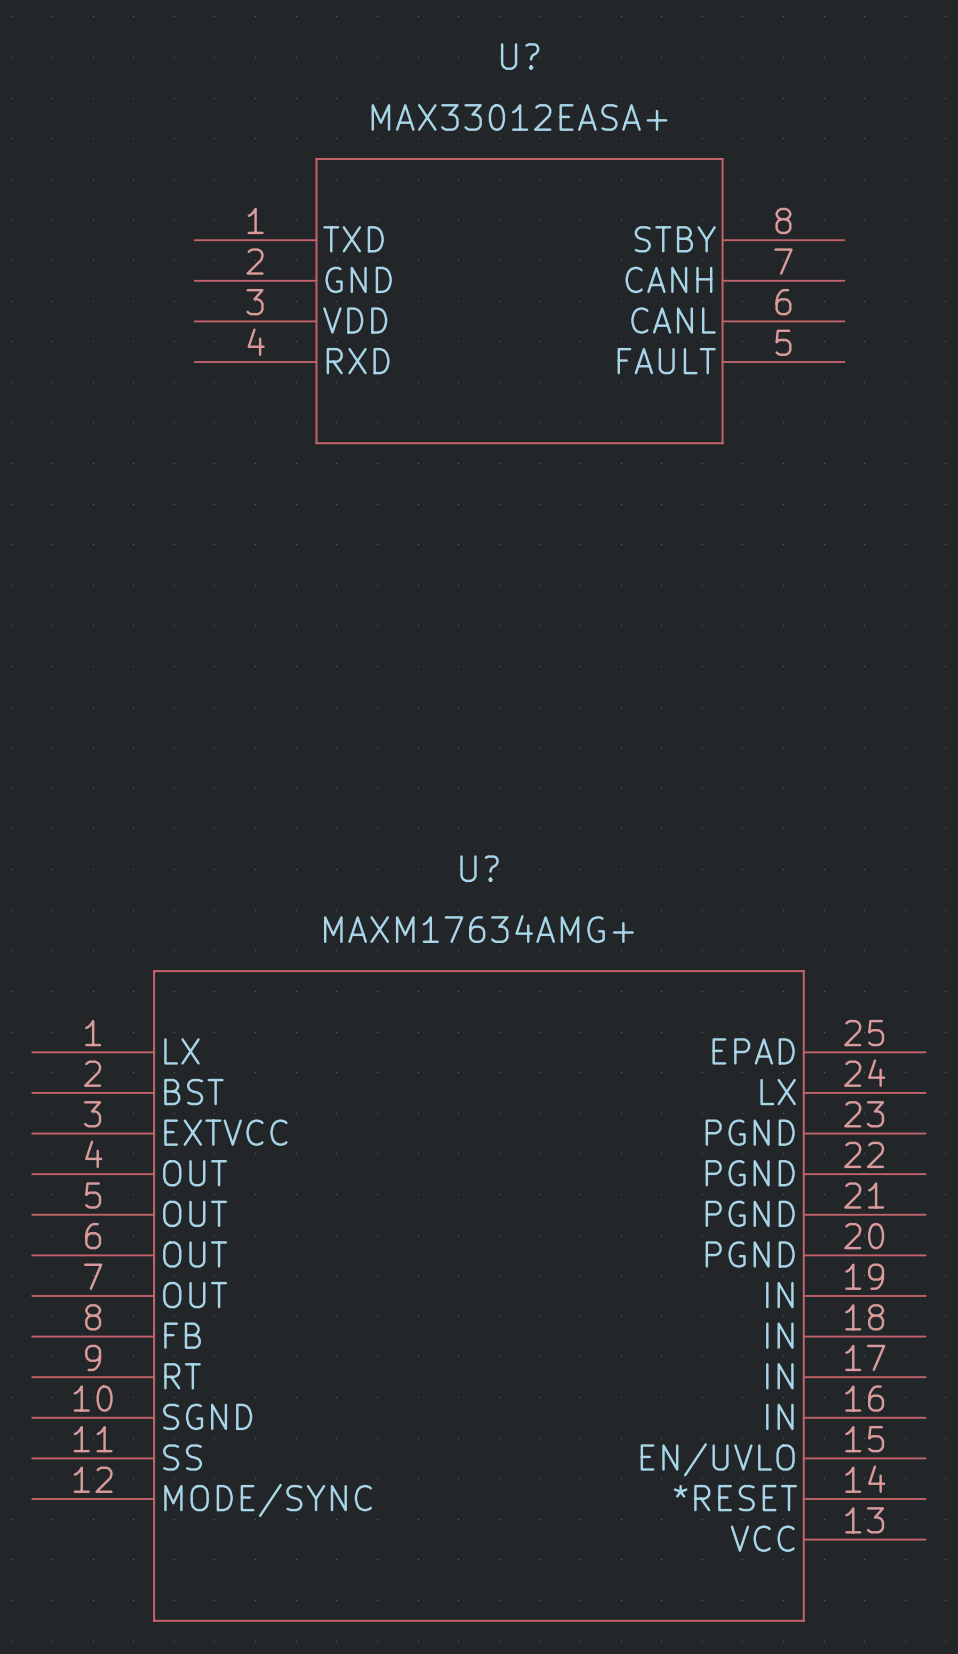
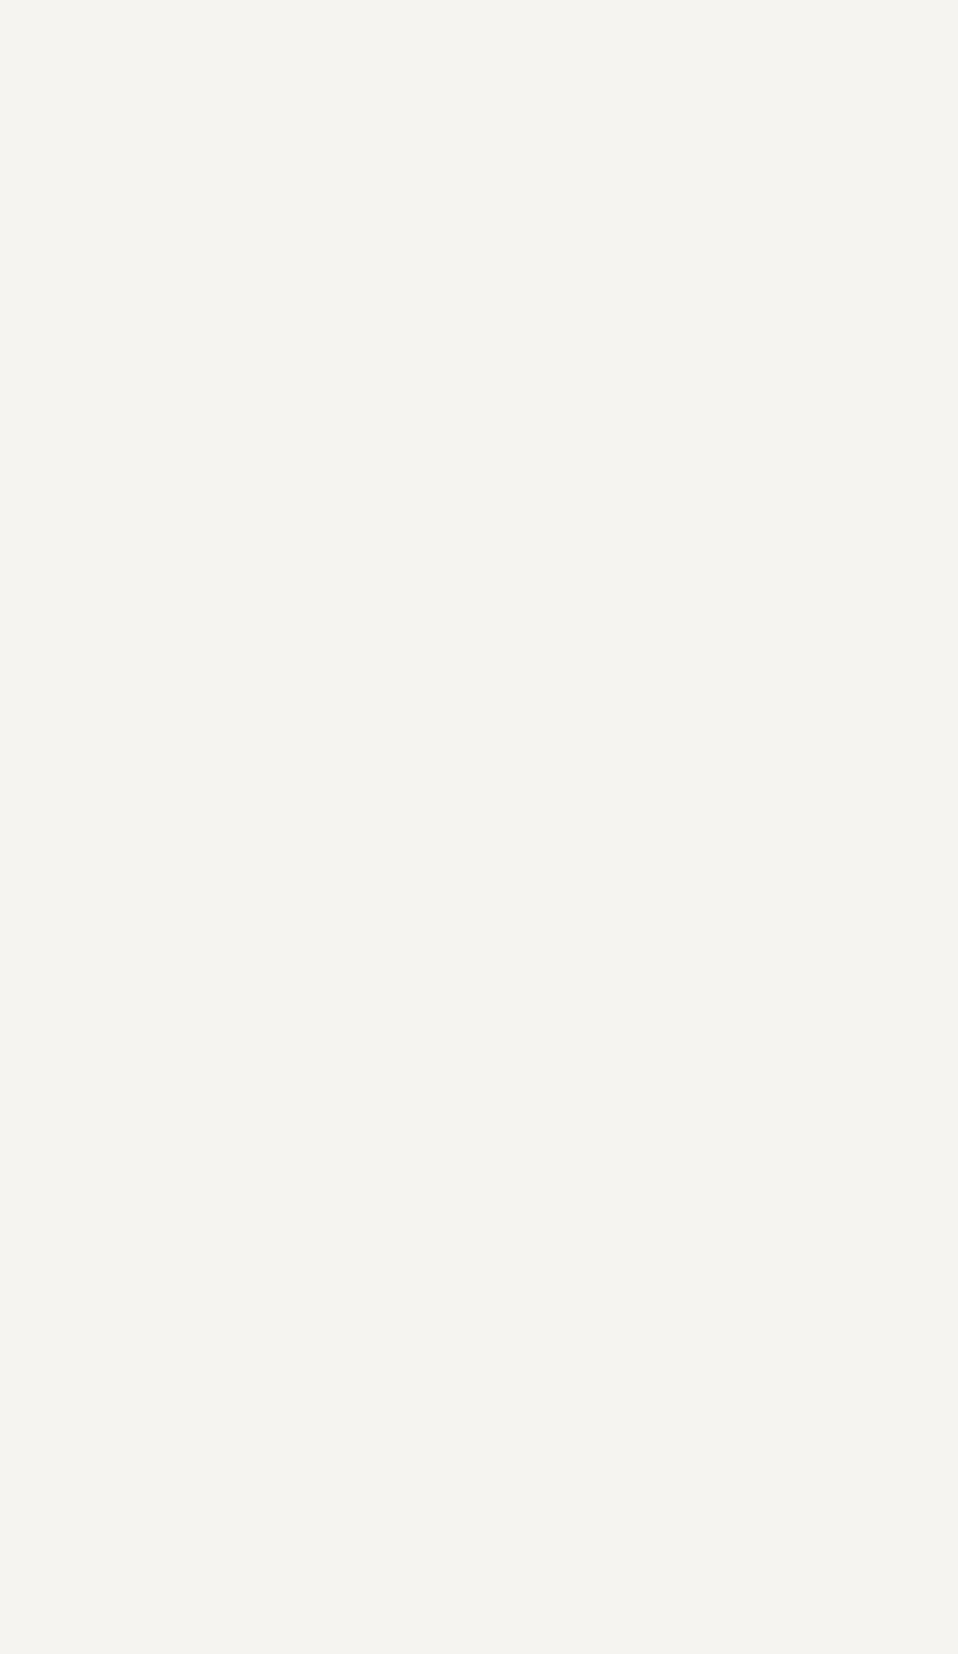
U?: MAX33012EASA+ (519, 301) -> none
U?: MAXM17634AMG+ (478, 1295) -> none

